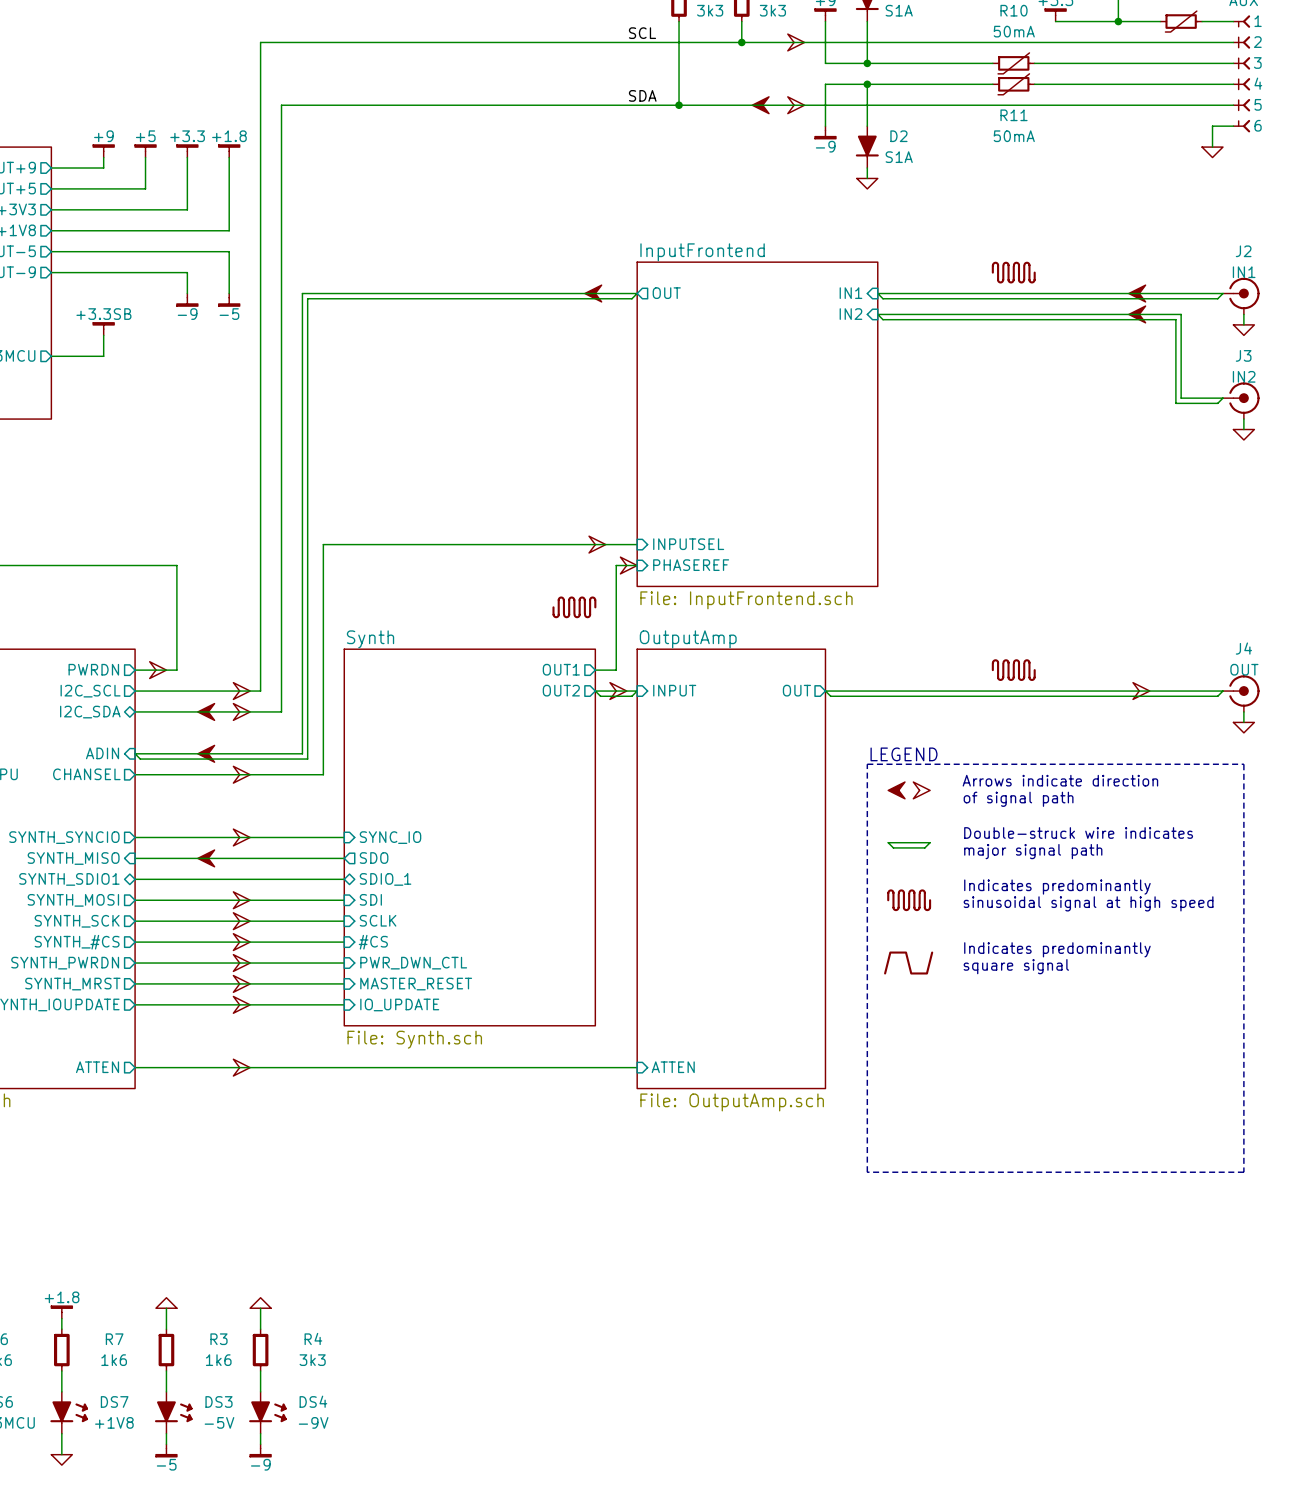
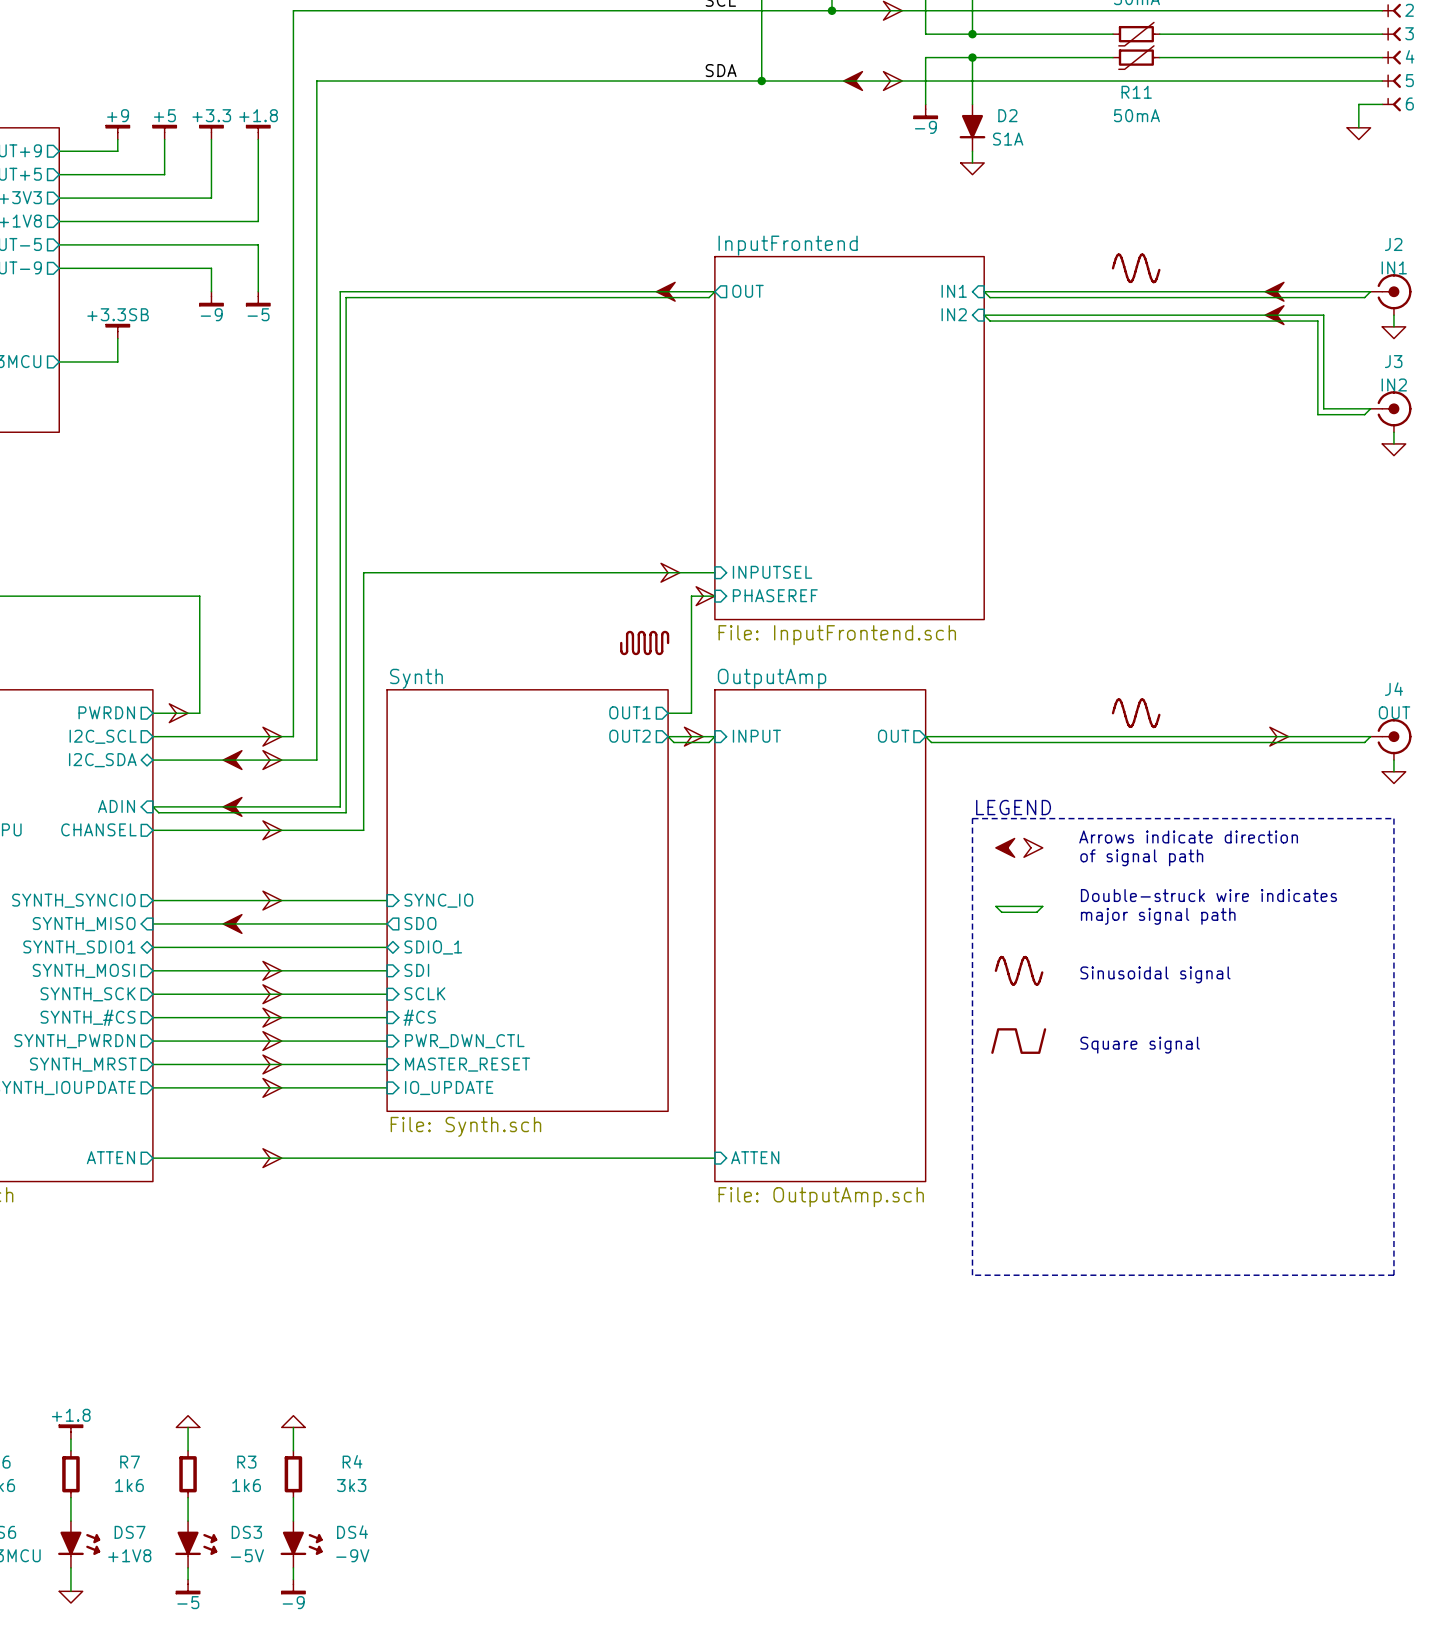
power symbol shape: [991, 261, 1036, 284] -> [1111, 253, 1161, 284]
power symbol shape: [991, 659, 1036, 681] -> [1111, 698, 1161, 729]
text: Indicates predominantly (1057, 887) -> none
power symbol shape: [887, 889, 932, 912] -> [994, 955, 1044, 986]
text: sinusoidal signal at high speed (1088, 903) -> Sinusoidal signal (1155, 974)
text: Indicates predominantly (1057, 949) -> none
text: square signal (1016, 966) -> Square signal (1140, 1045)

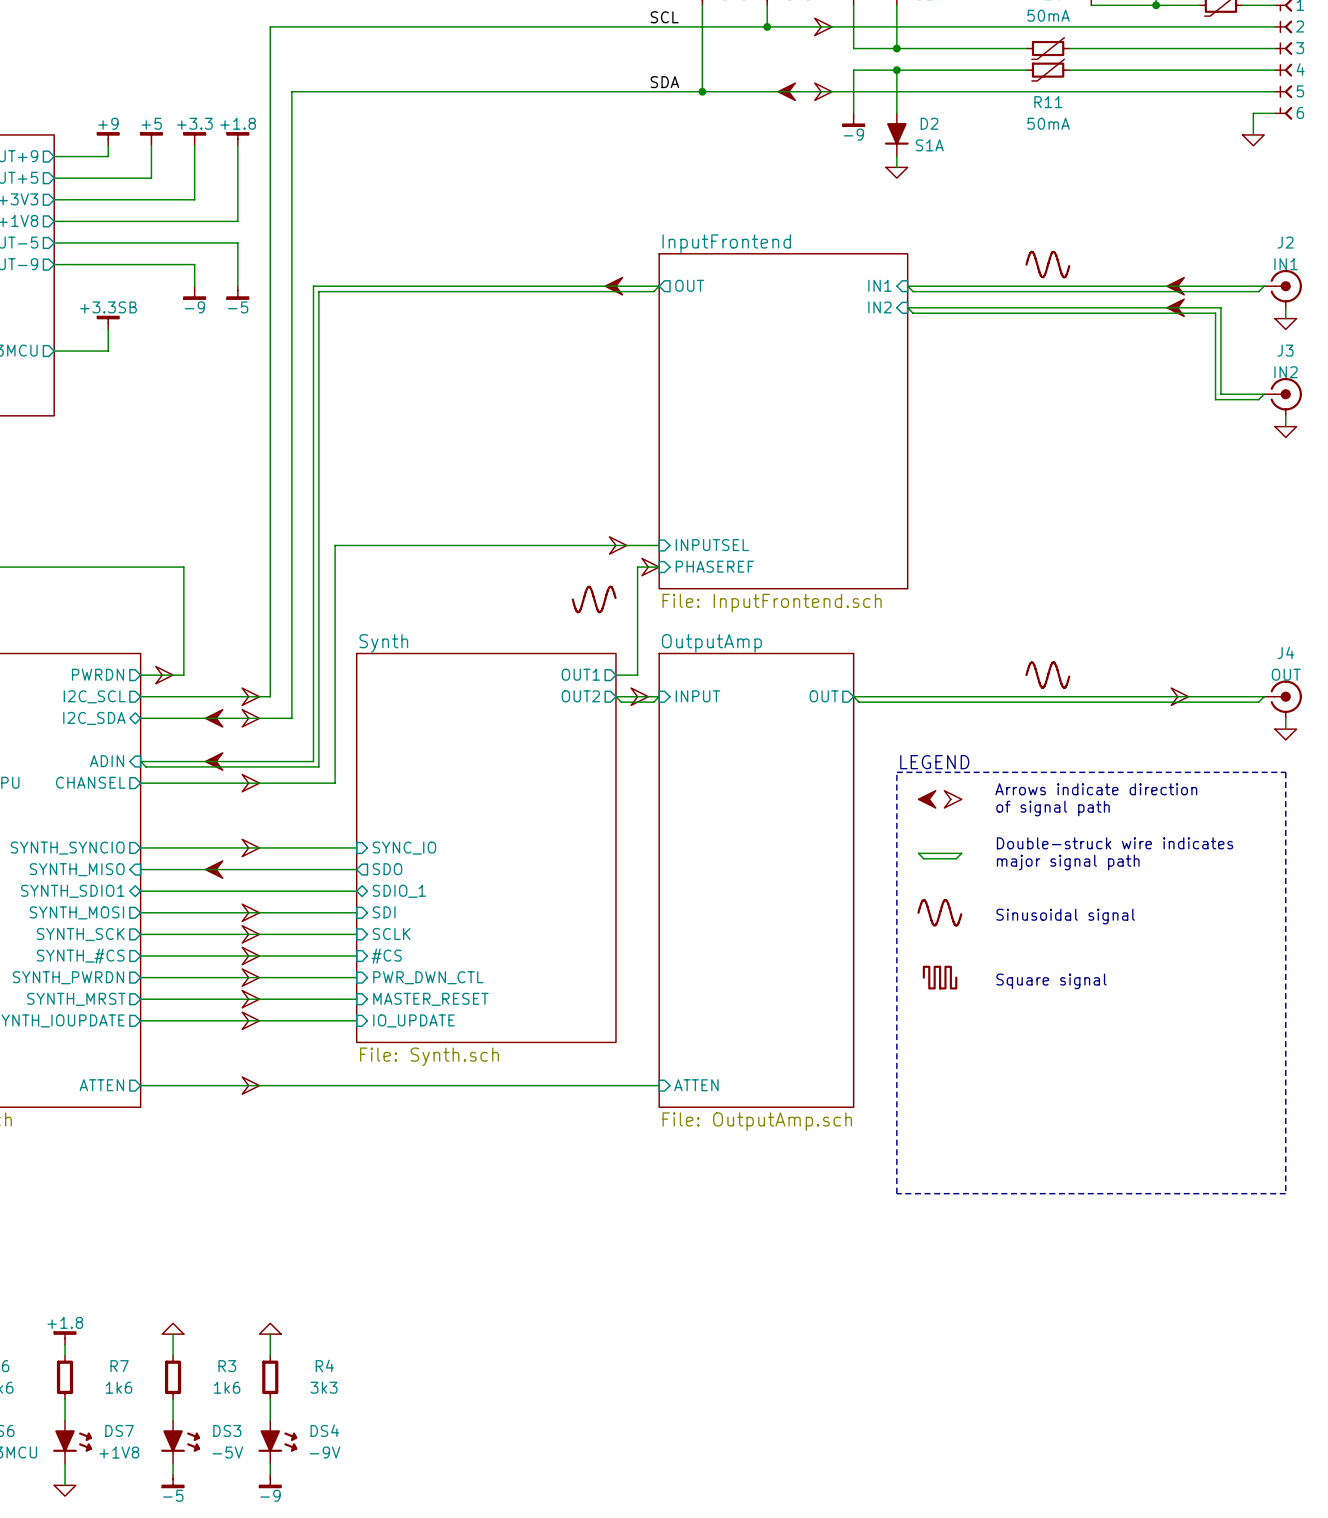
power symbol: none -> (594, 599)
power symbol: (644, 642) -> none
power symbol shape: [991, 1028, 1047, 1054] -> [922, 965, 958, 990]

